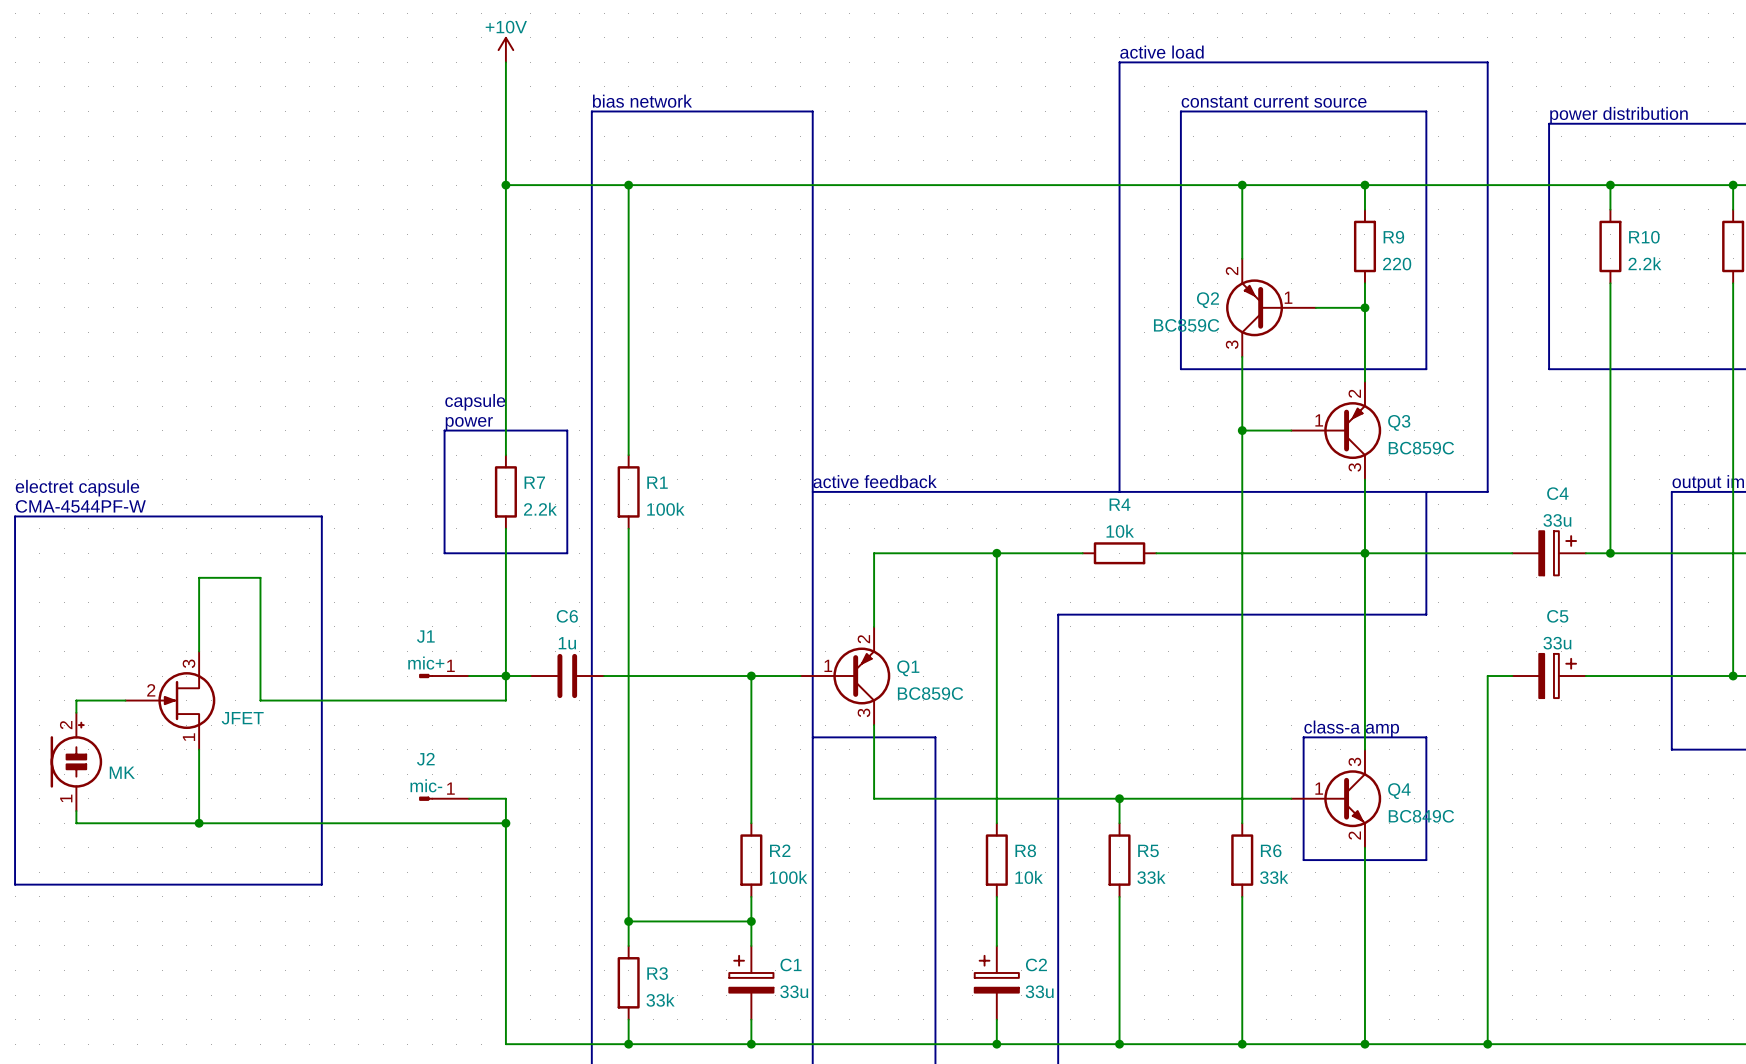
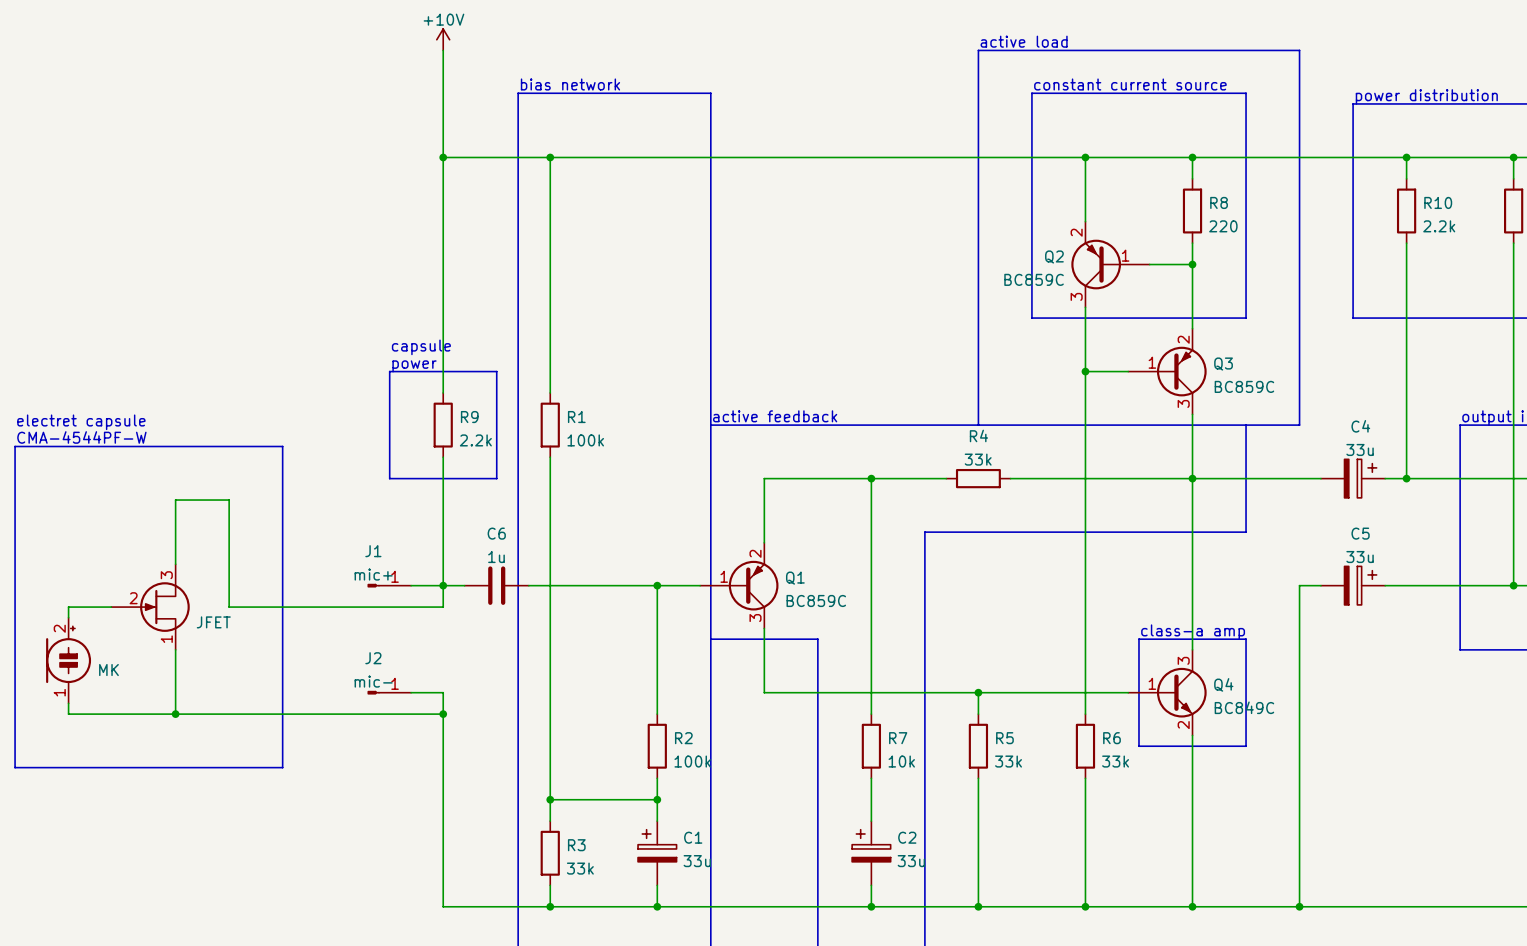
R9 name: R9 (1393, 237) -> R8 (1219, 202)
R7 name: R7 (534, 482) -> R9 (469, 417)
R4 value: 10k (1120, 531) -> 33k (978, 459)
R8 name: R8 (1025, 850) -> R7 (898, 738)

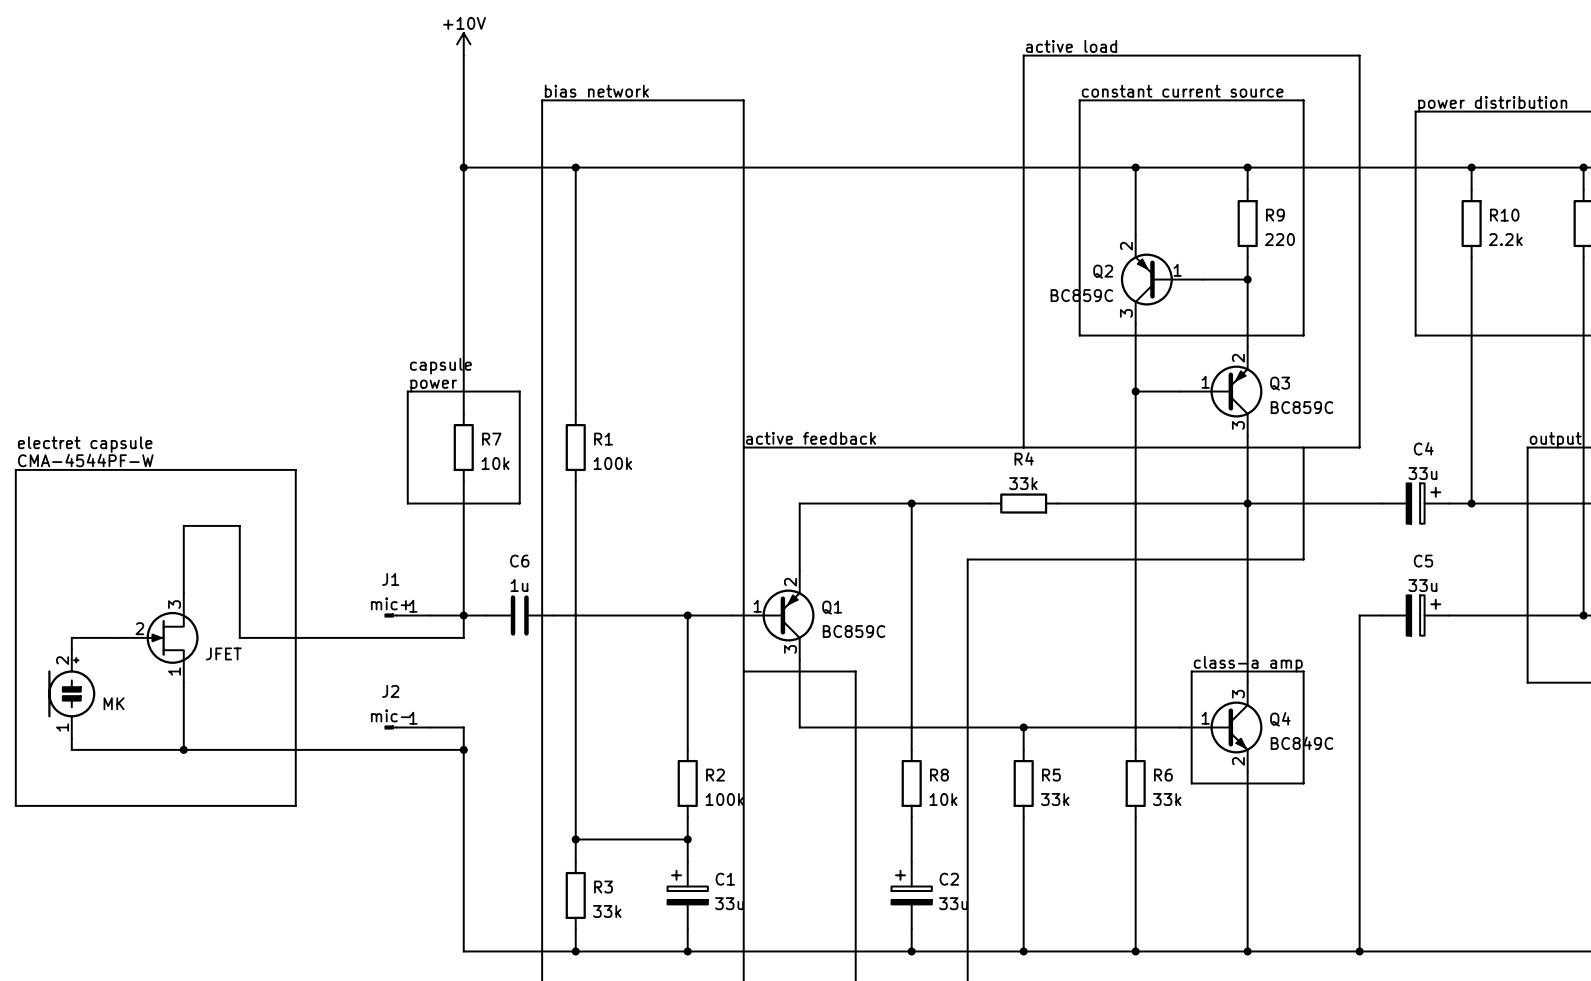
R8 name: R8 (1219, 202) -> R9 (1275, 215)
R9 name: R9 (469, 417) -> R7 (491, 439)
R9 value: 2.2k (475, 440) -> 10k (495, 463)
R7 name: R7 (898, 738) -> R8 (939, 775)

